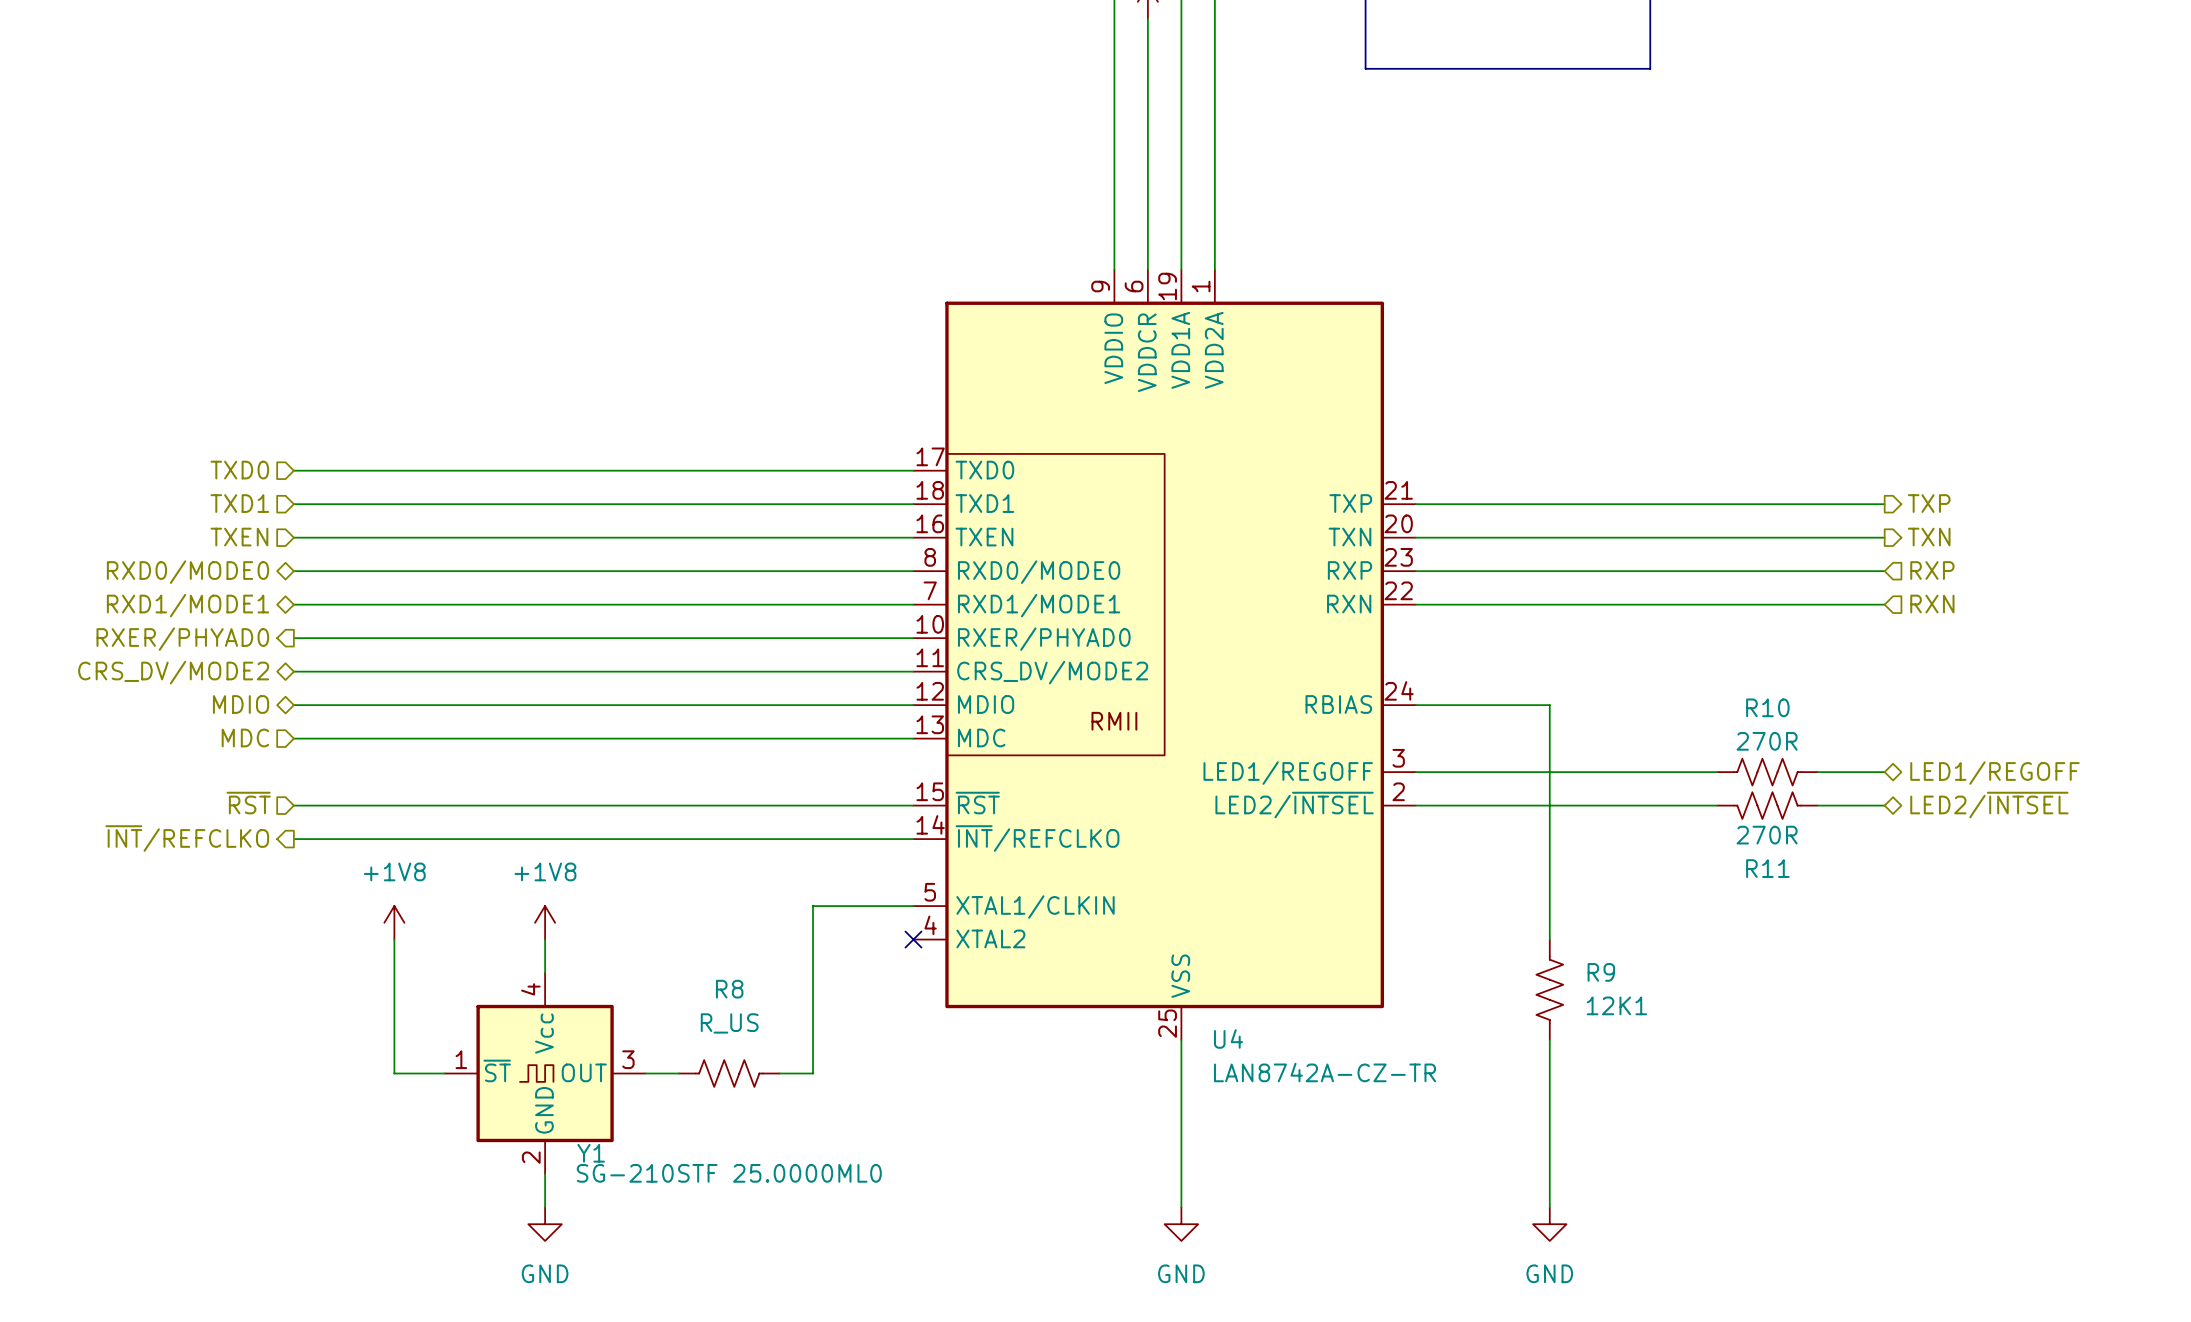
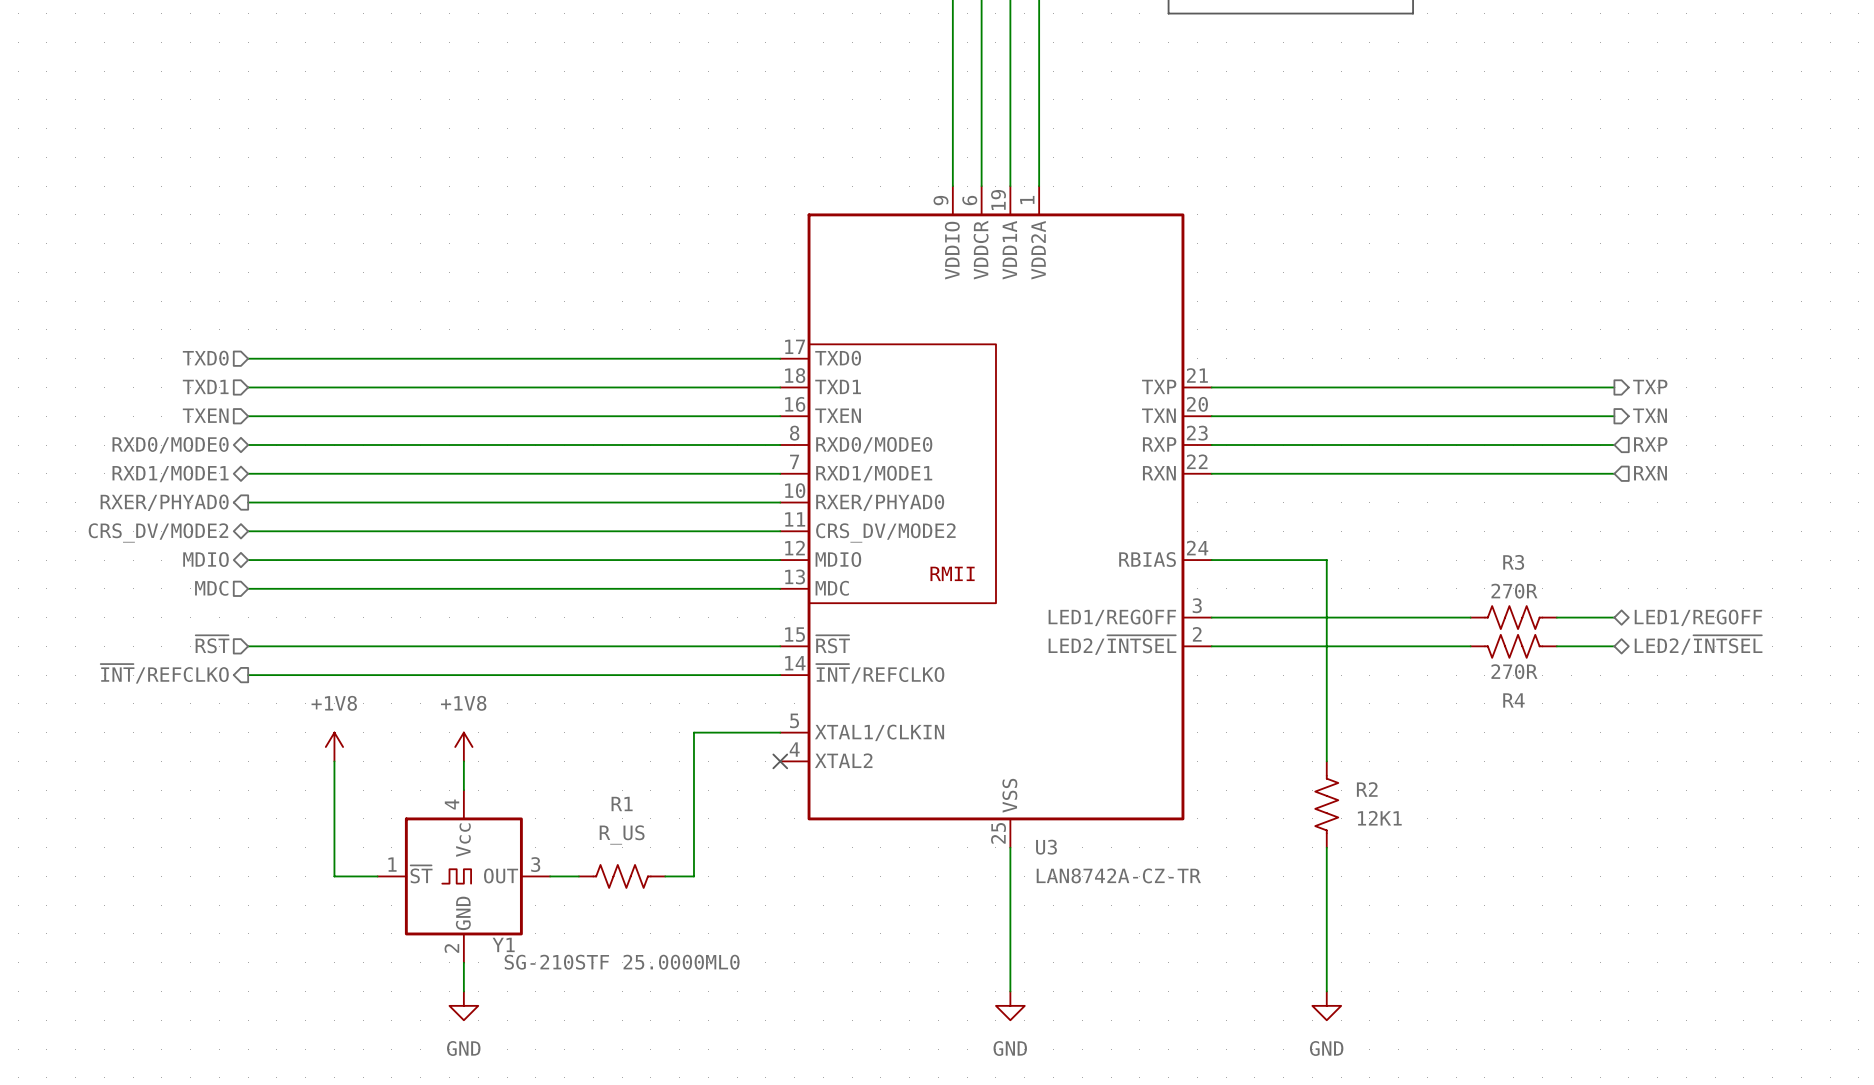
R10 name: R10 (1767, 707) -> R3 (1513, 562)
R11 name: R11 (1767, 868) -> R4 (1513, 700)
R9 name: R9 (1601, 972) -> R2 (1367, 789)
R8 name: R8 (729, 989) -> R1 (622, 804)
U4 name: U4 (1228, 1038) -> U3 (1046, 847)

